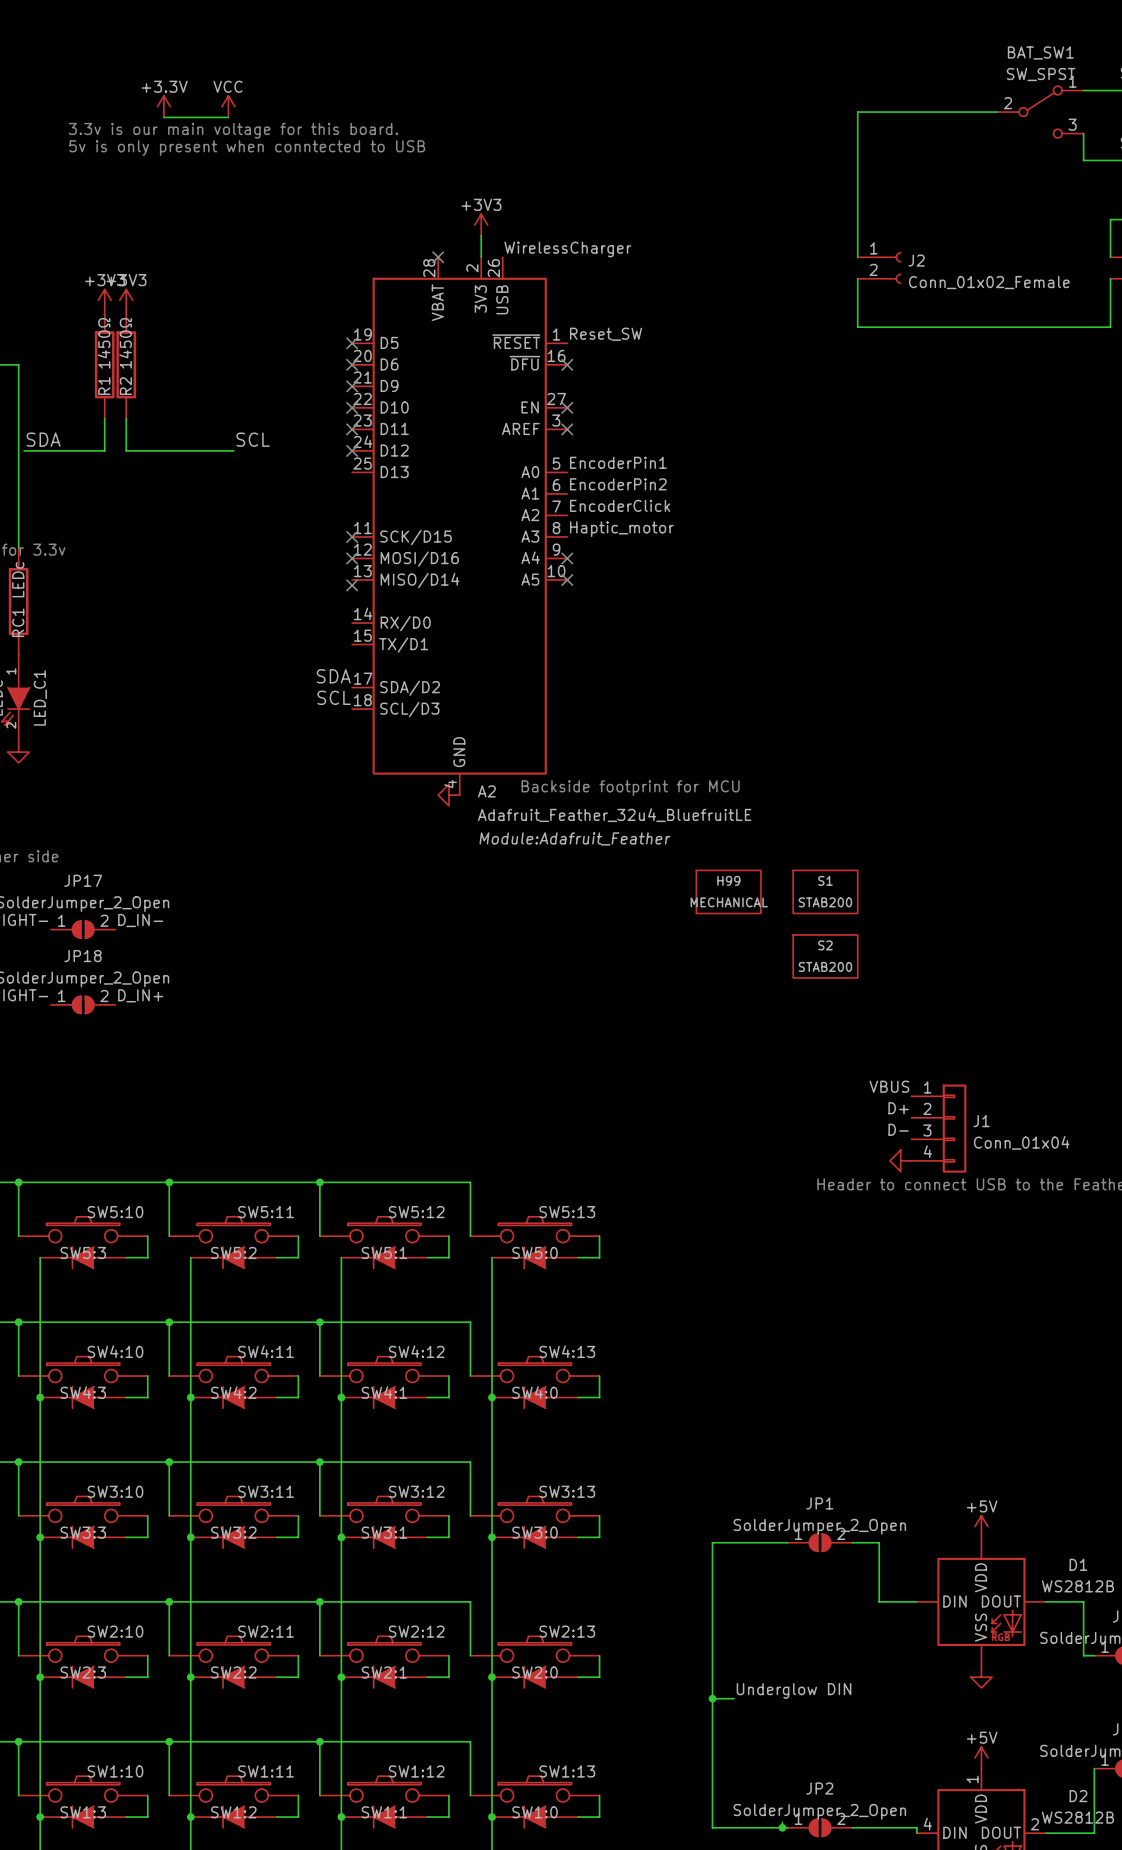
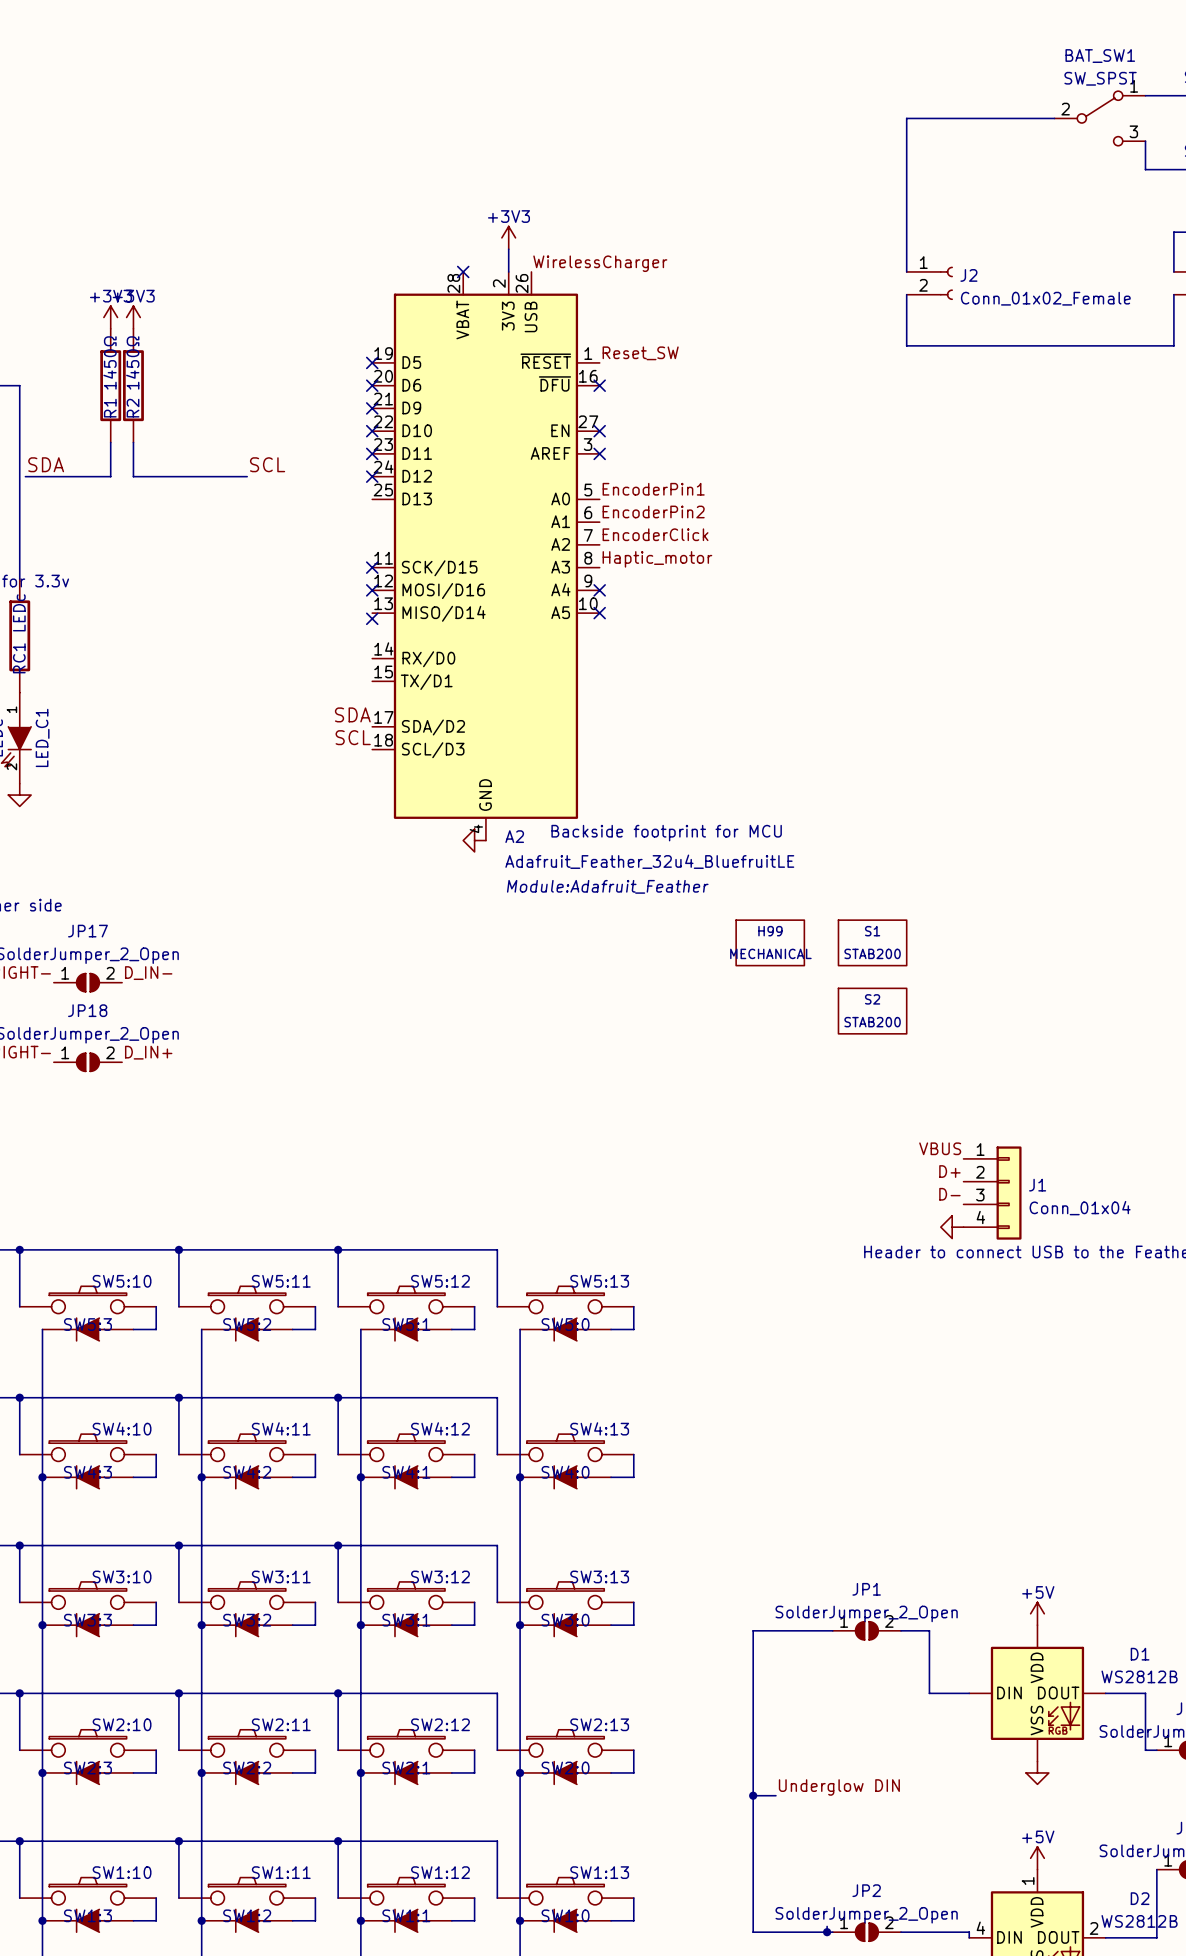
power symbol: +3.3V (163, 106) -> none
power symbol: VCC (228, 106) -> none
wire: (163, 117) (228, 117) -> none
text: 3.3v is our main voltage for this board. (233, 130) -> none
text: 5v is only present when conntected to USB (247, 148) -> none

